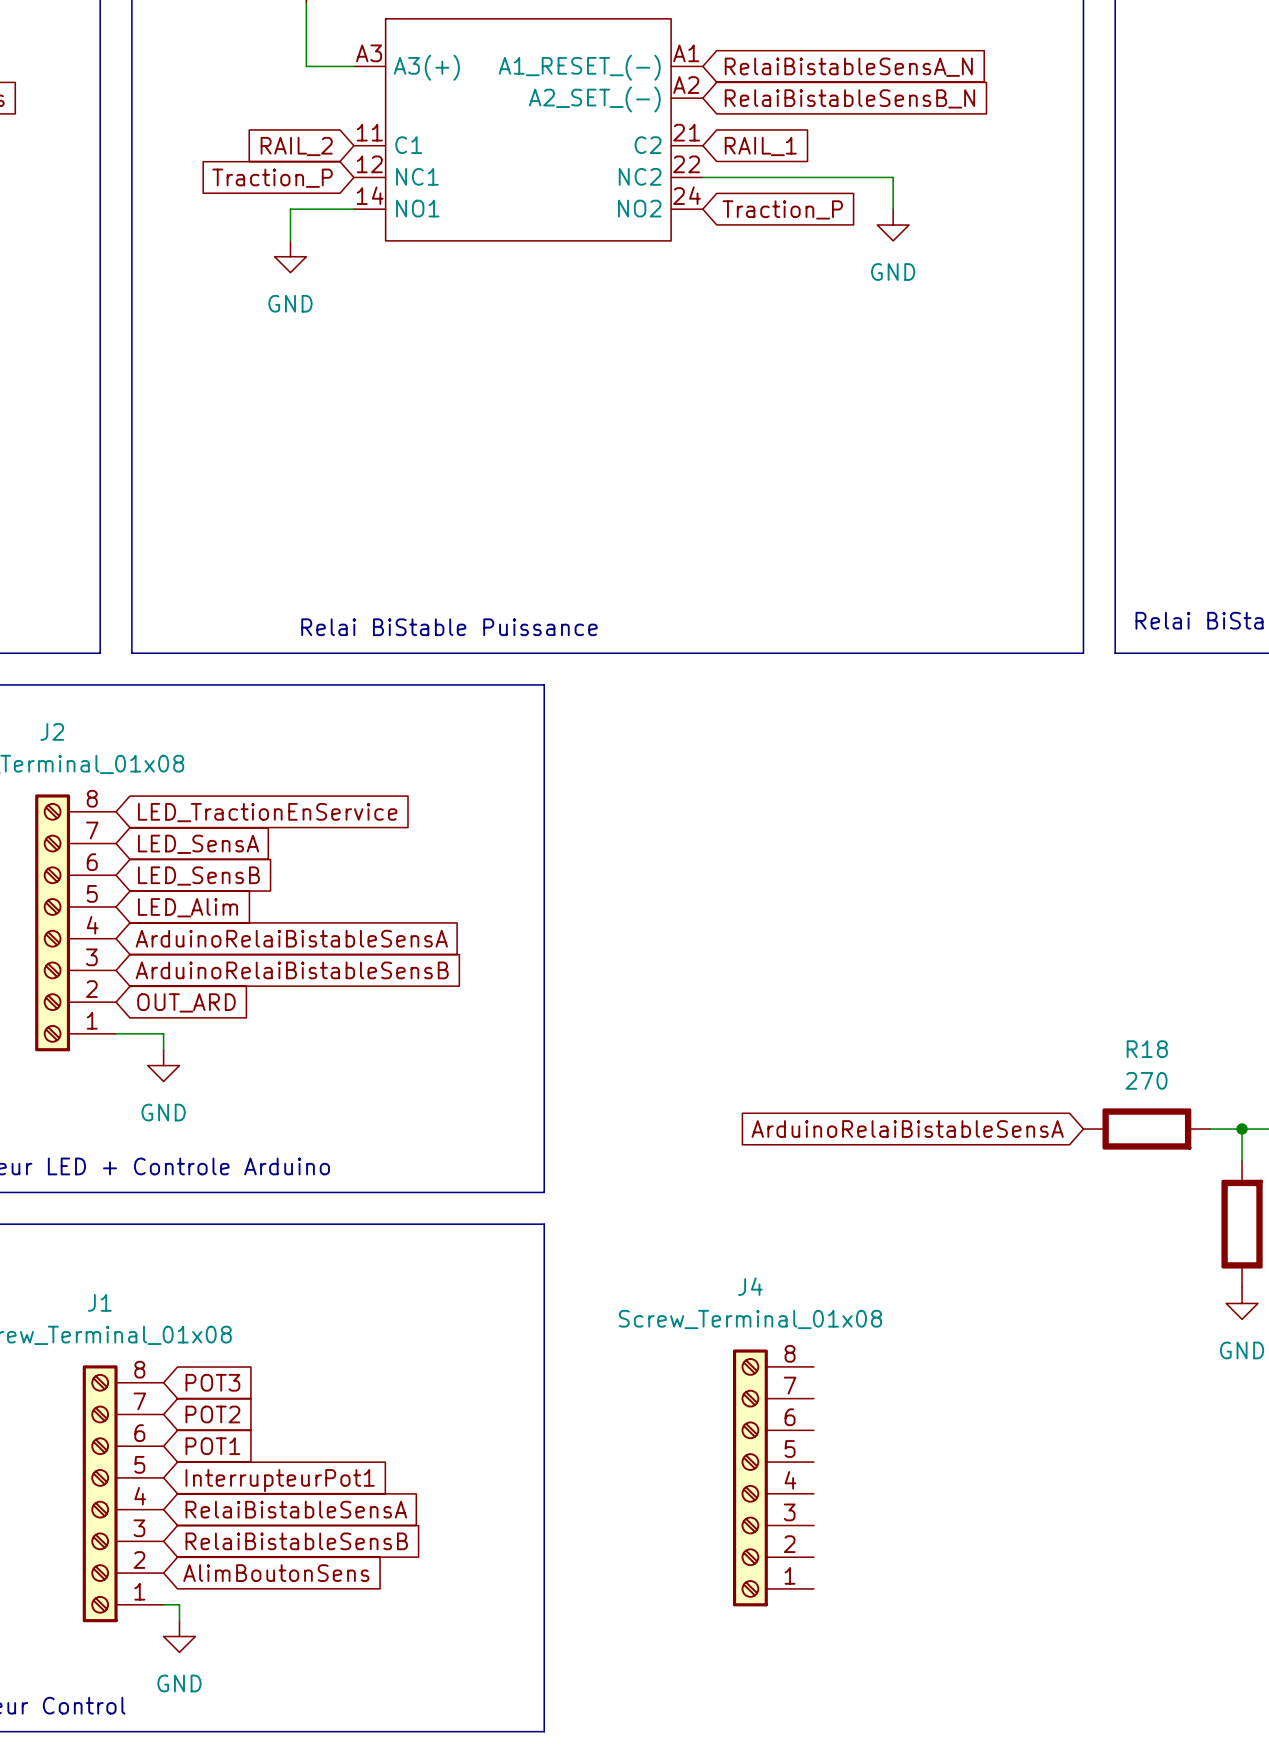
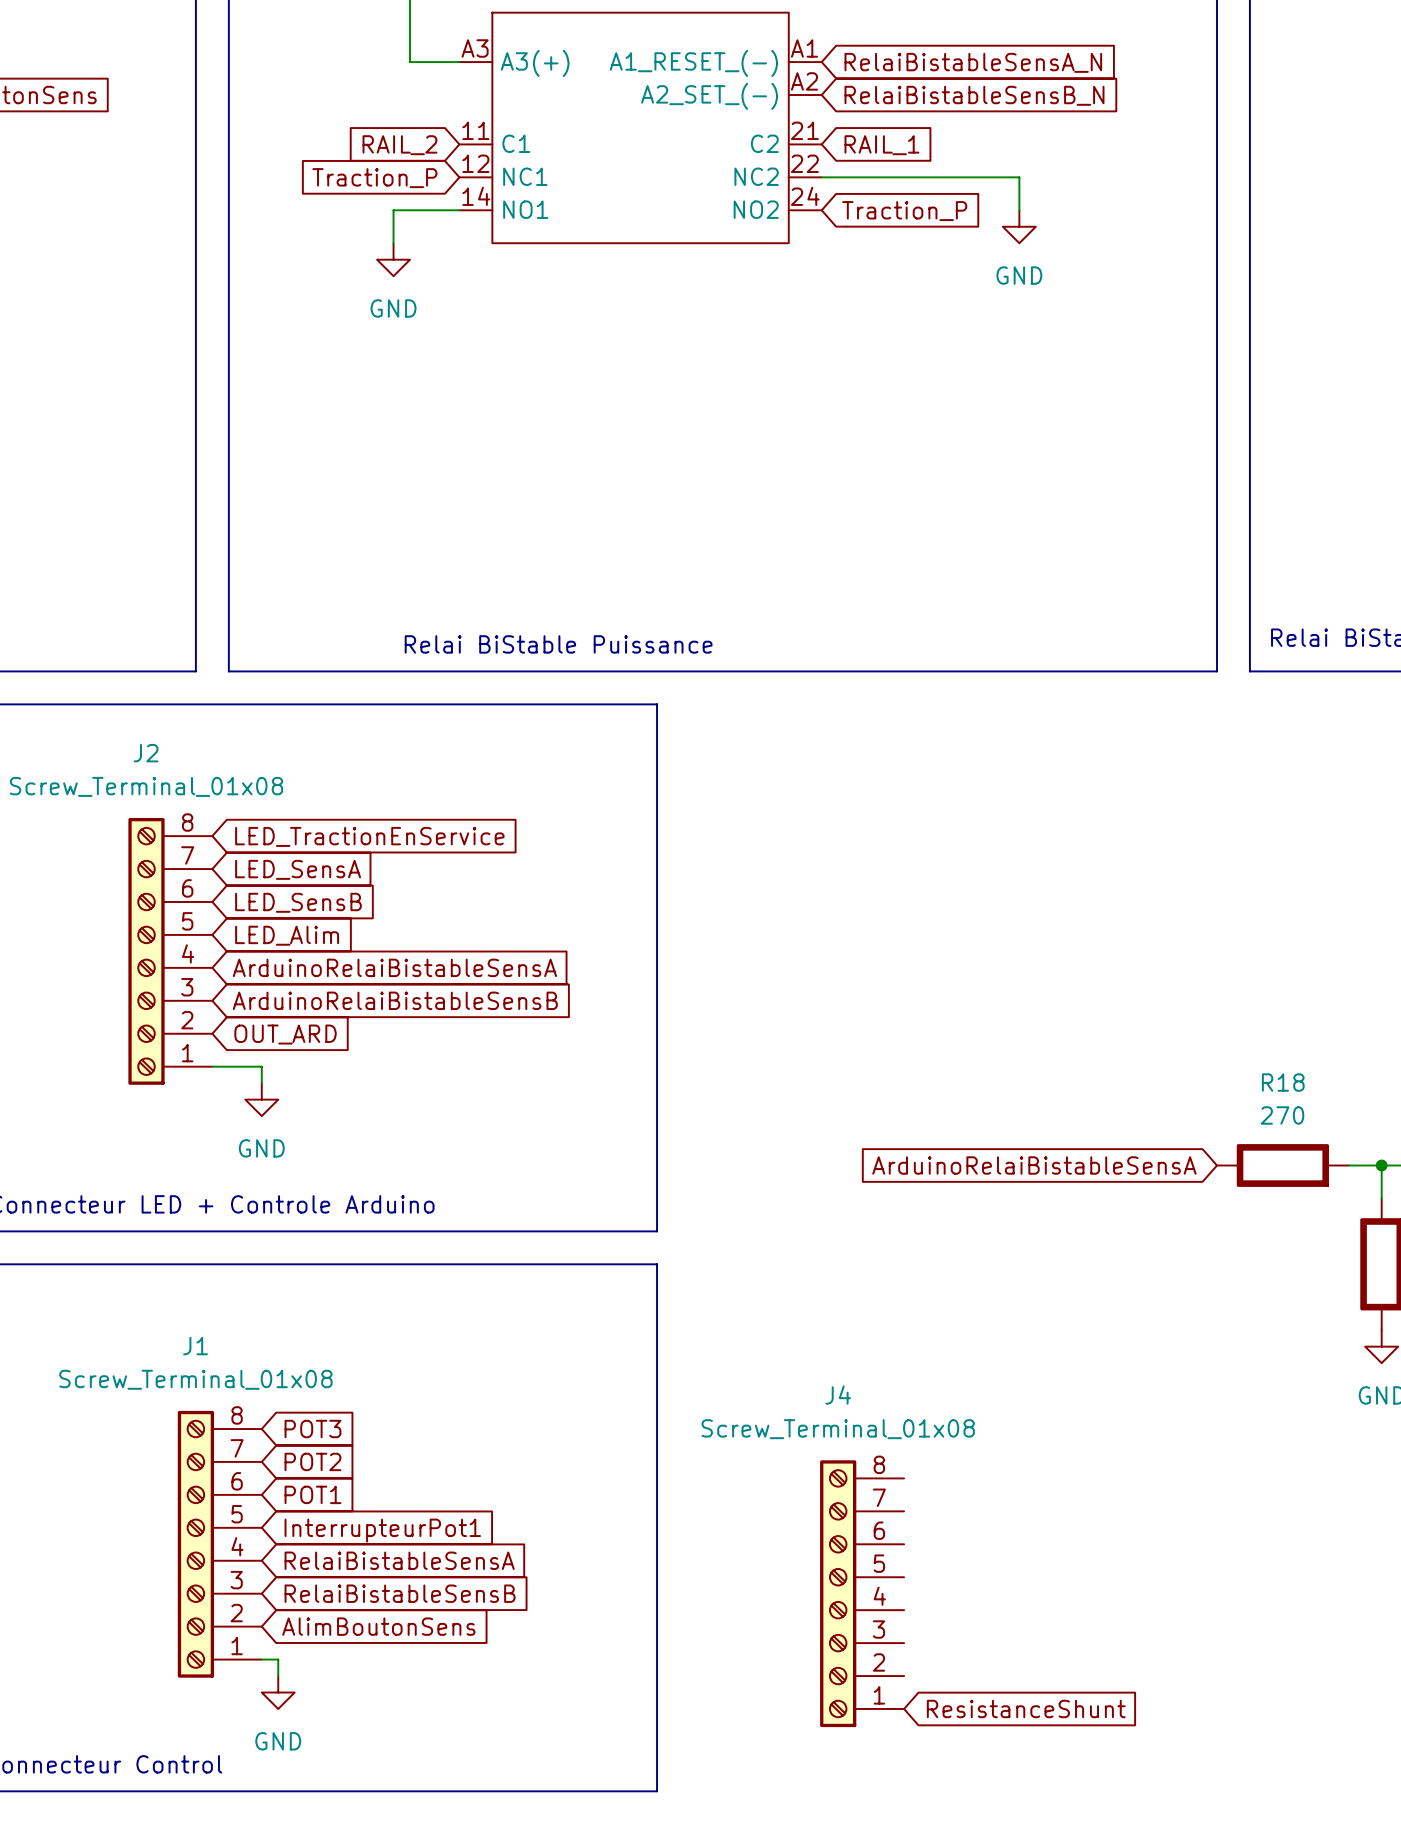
J4 position: (773, 1477) -> (862, 1593)
global label: none -> ResistanceShunt (1026, 1708)

